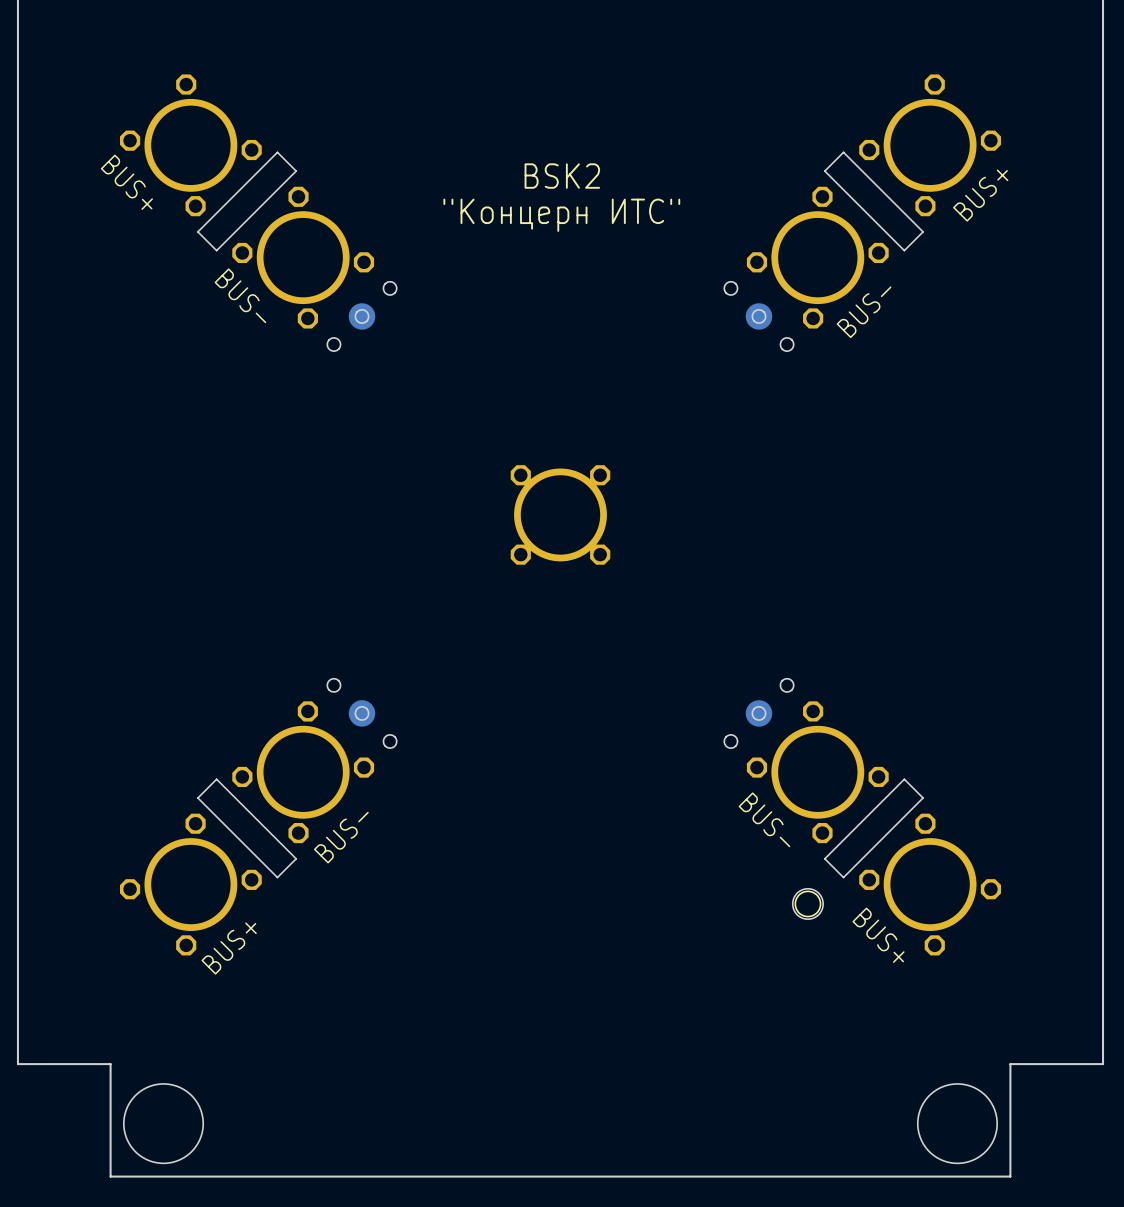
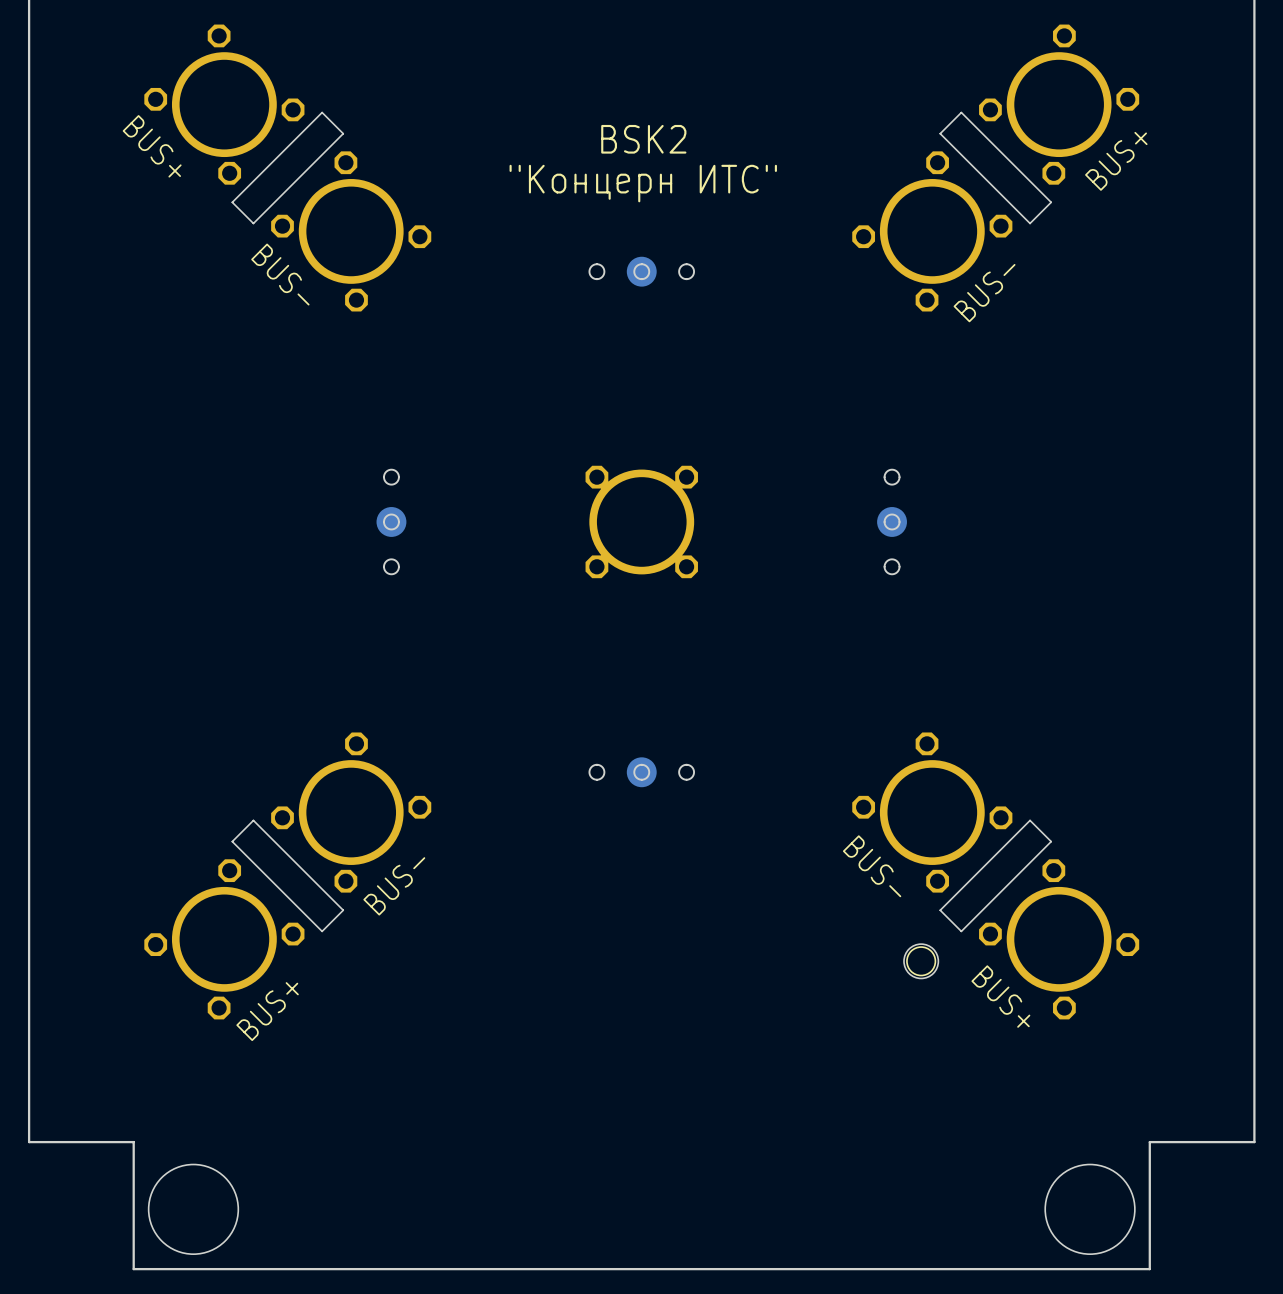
part: none -> (641, 271)
part: (362, 316) -> none
part: (758, 316) -> none
part: none -> (391, 521)
part: none -> (892, 521)
part: (362, 713) -> none
part: (758, 713) -> none
part: none -> (641, 772)

